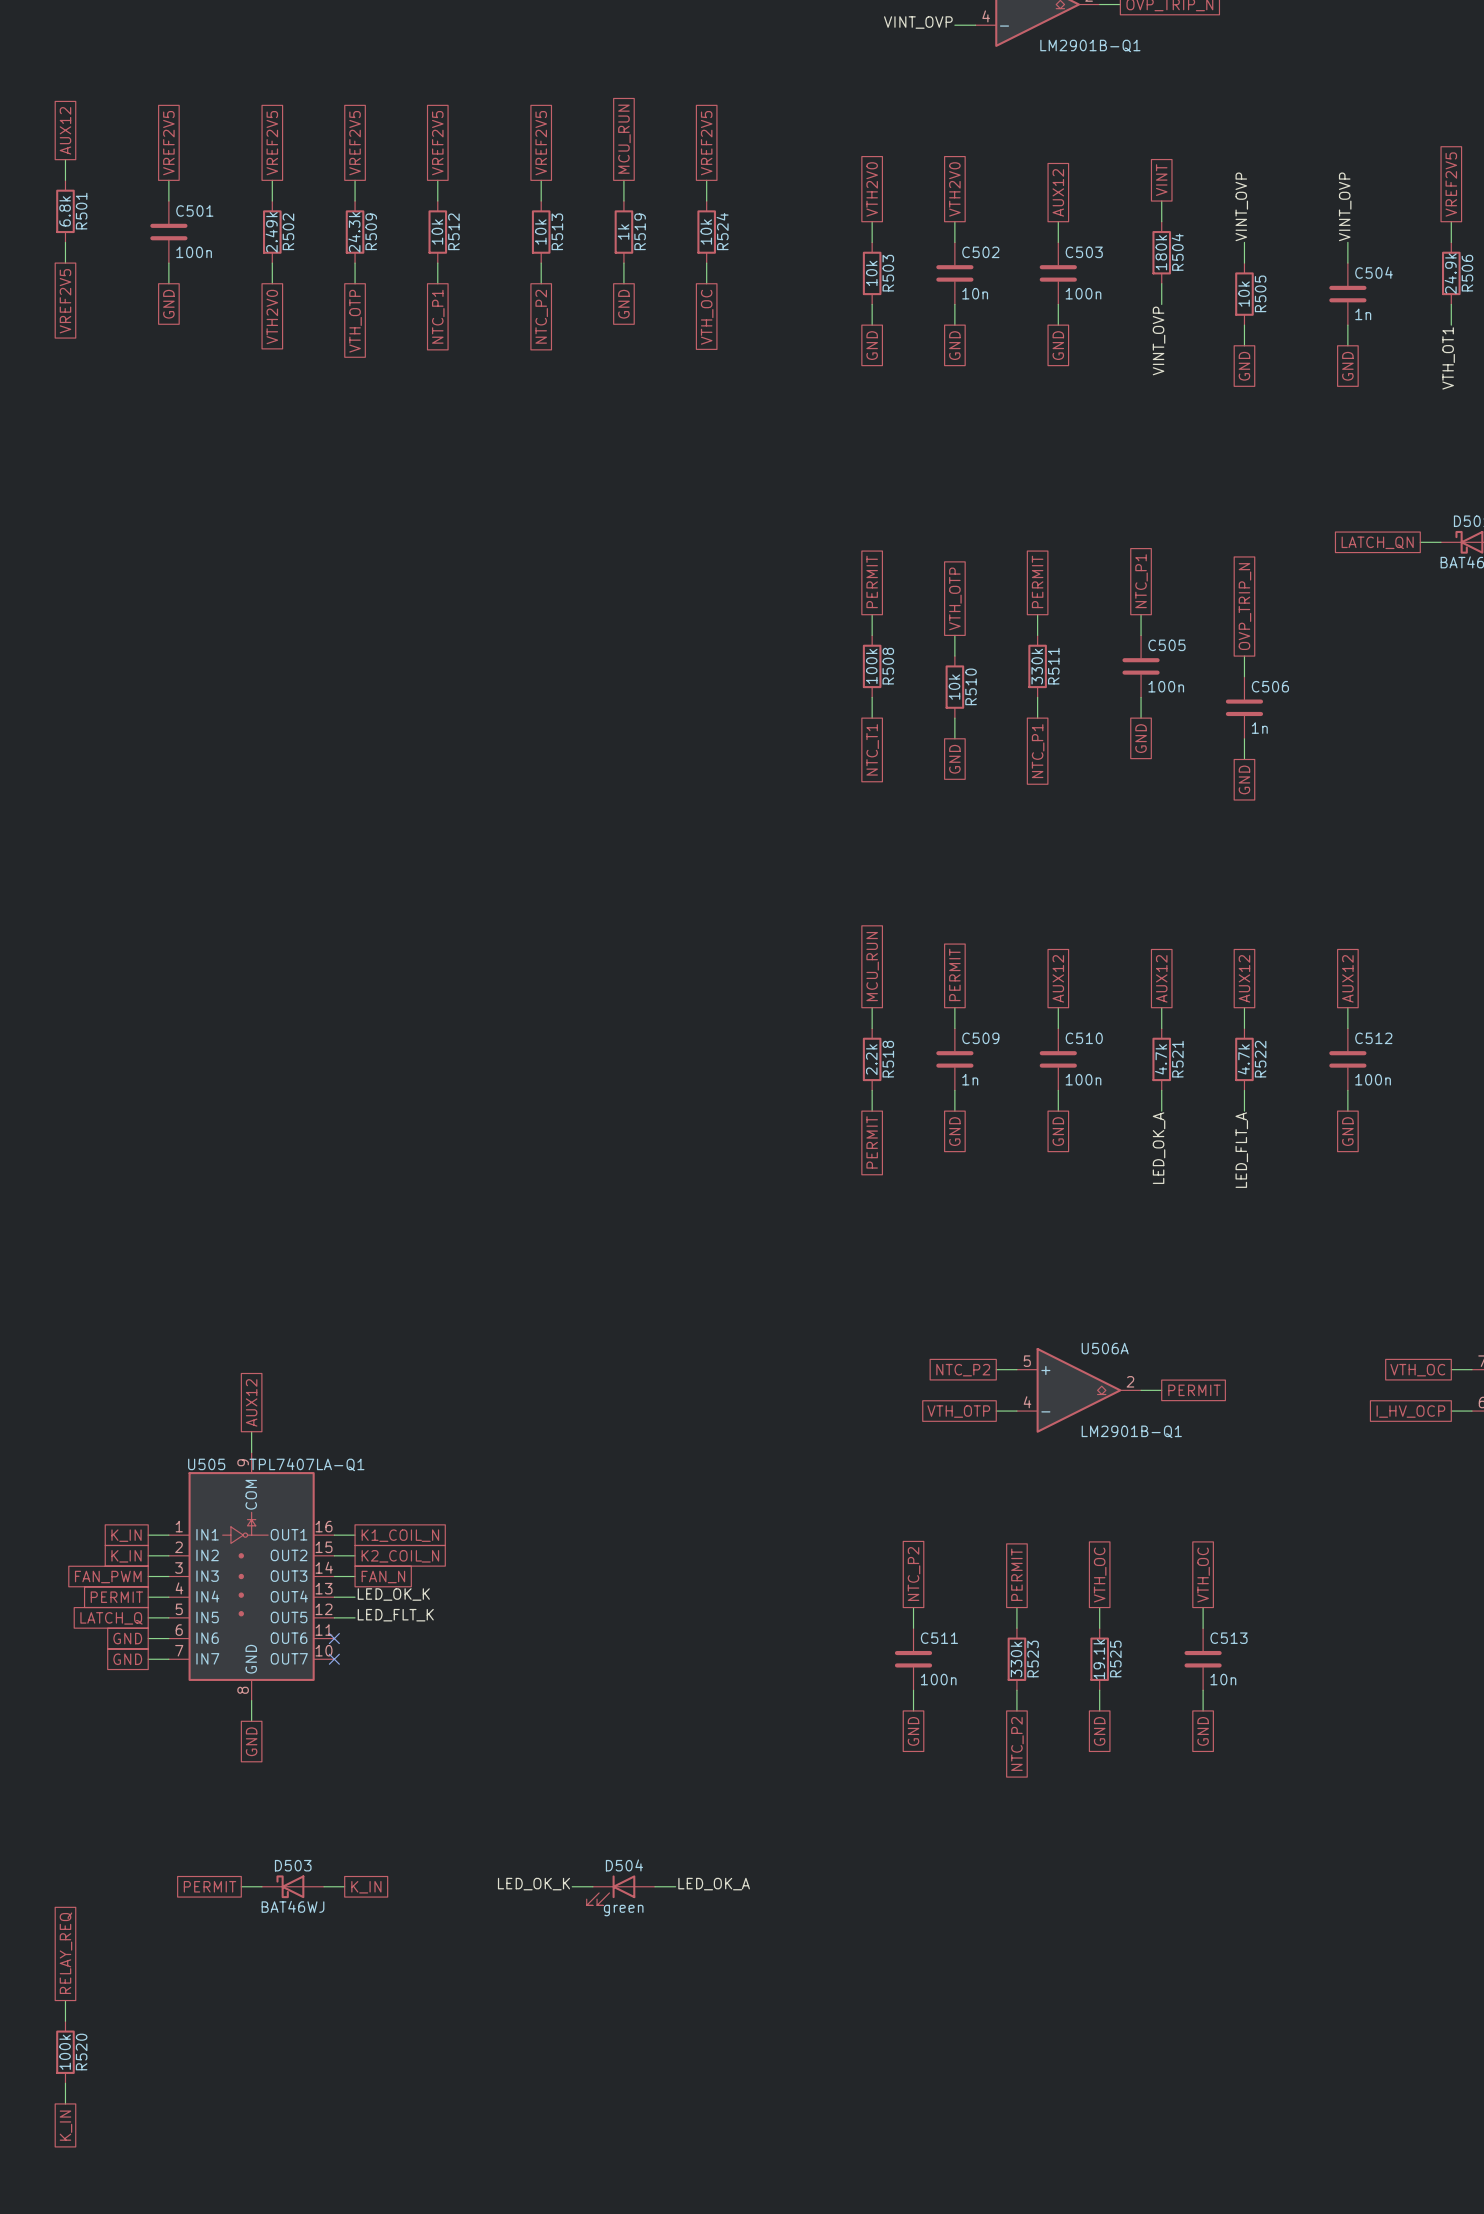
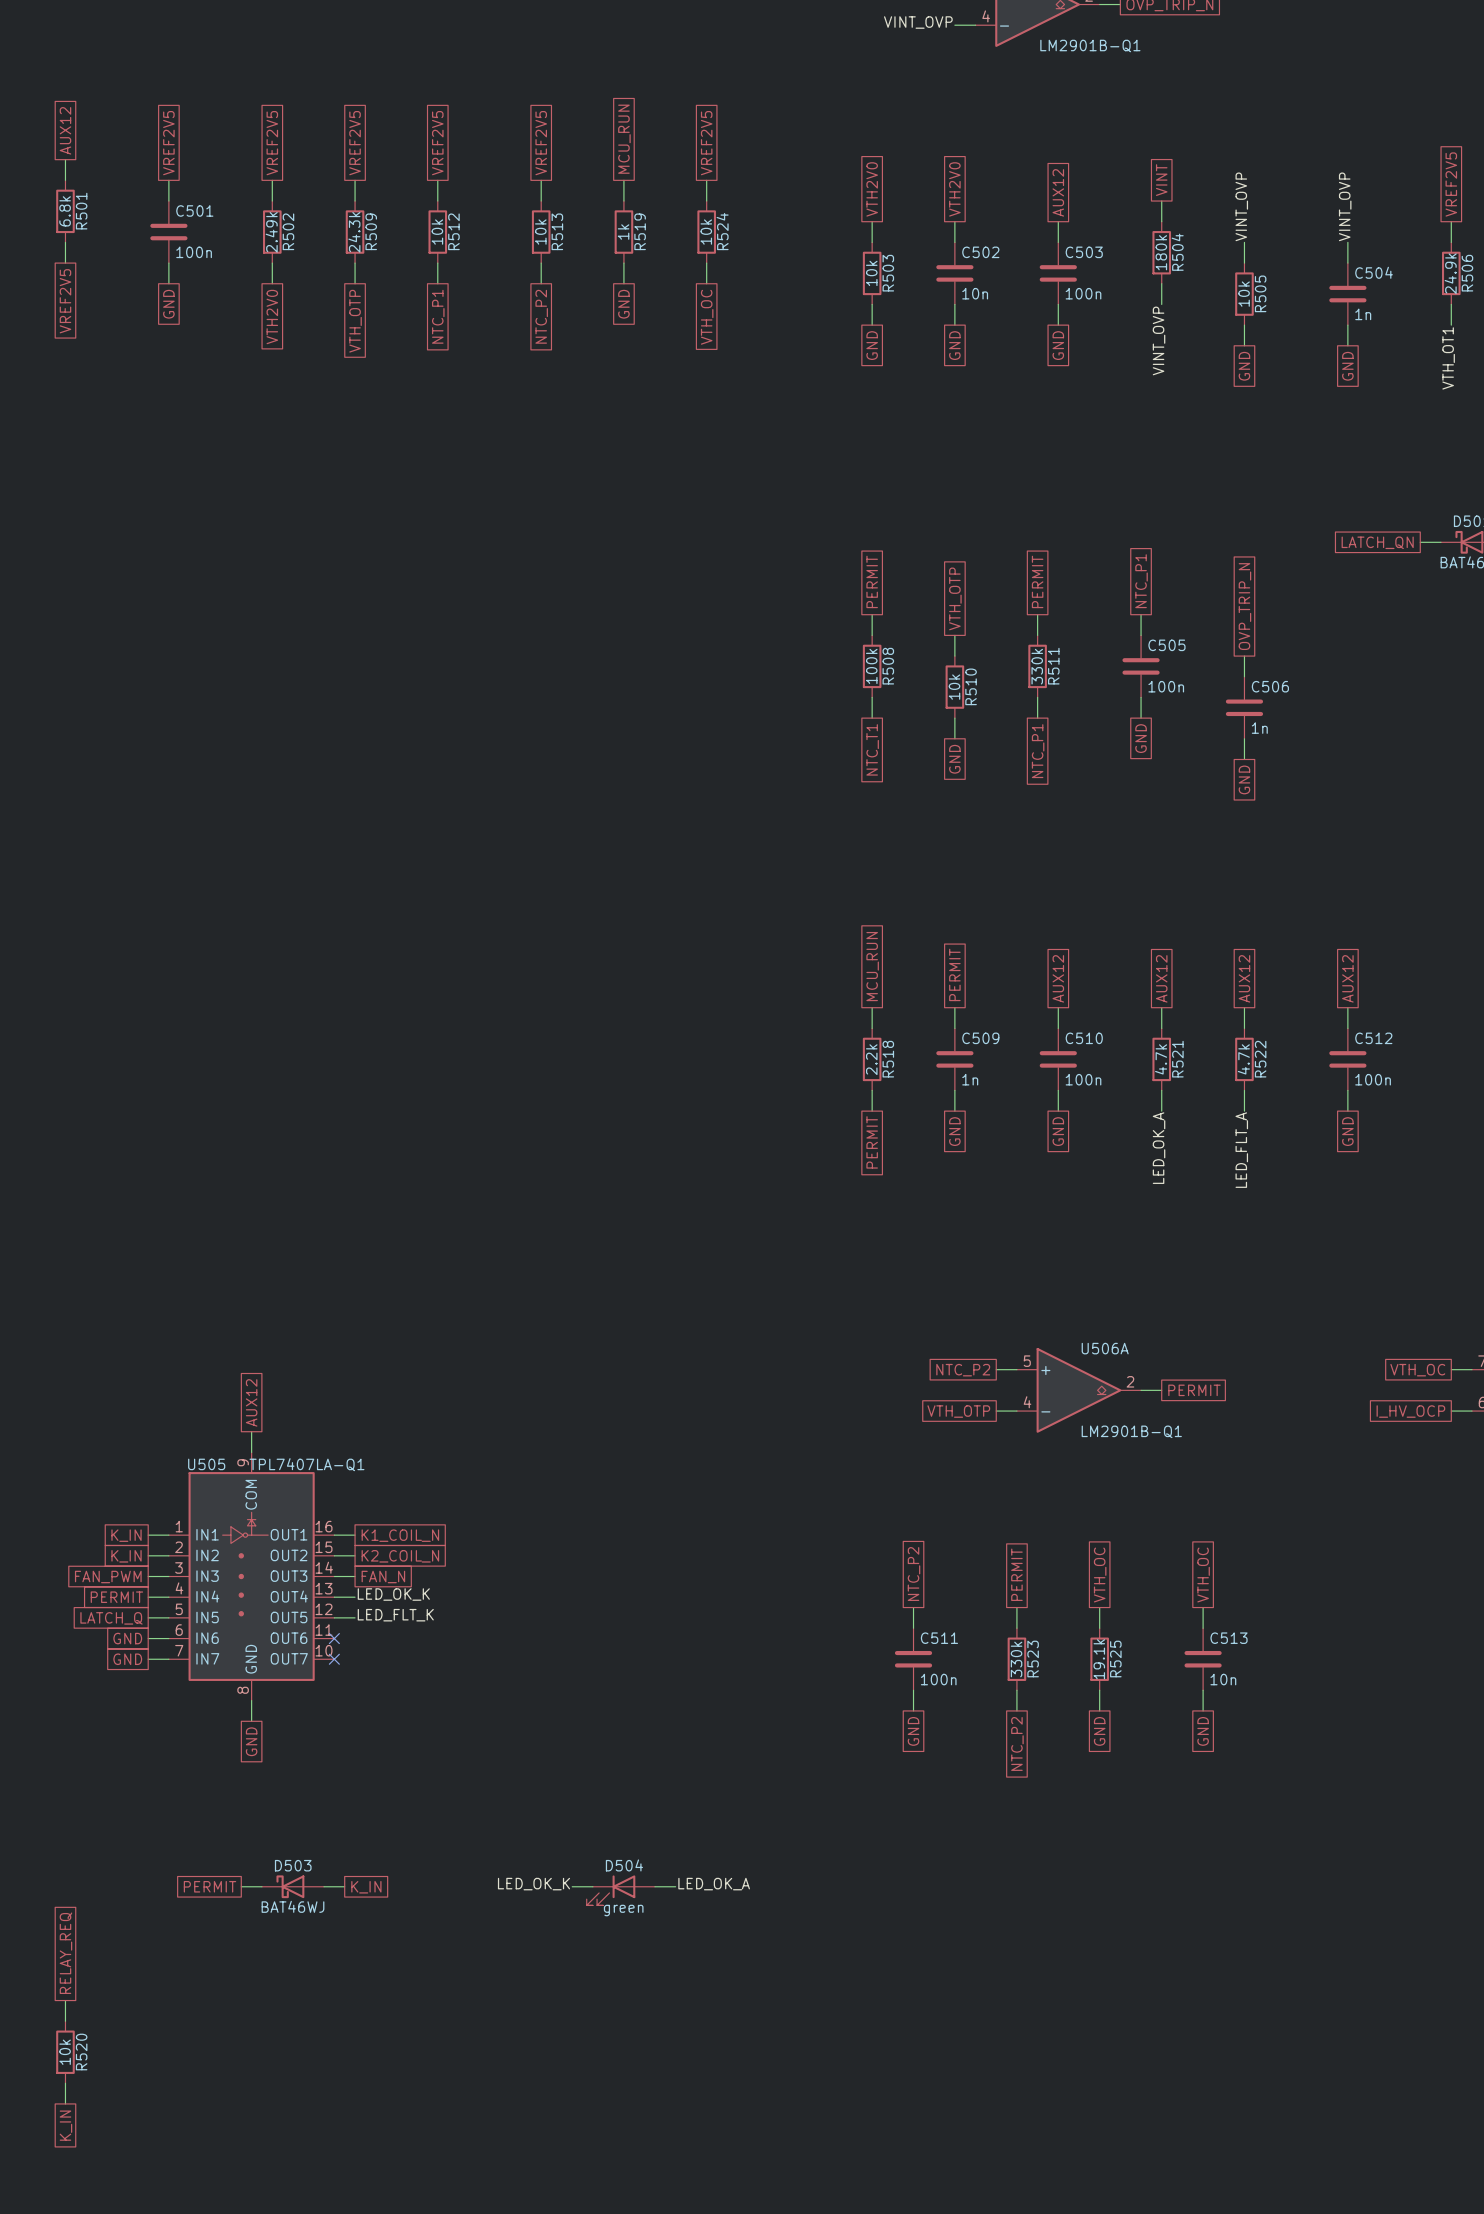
R520 value: 100k (65, 2052) -> 10k (65, 2052)

